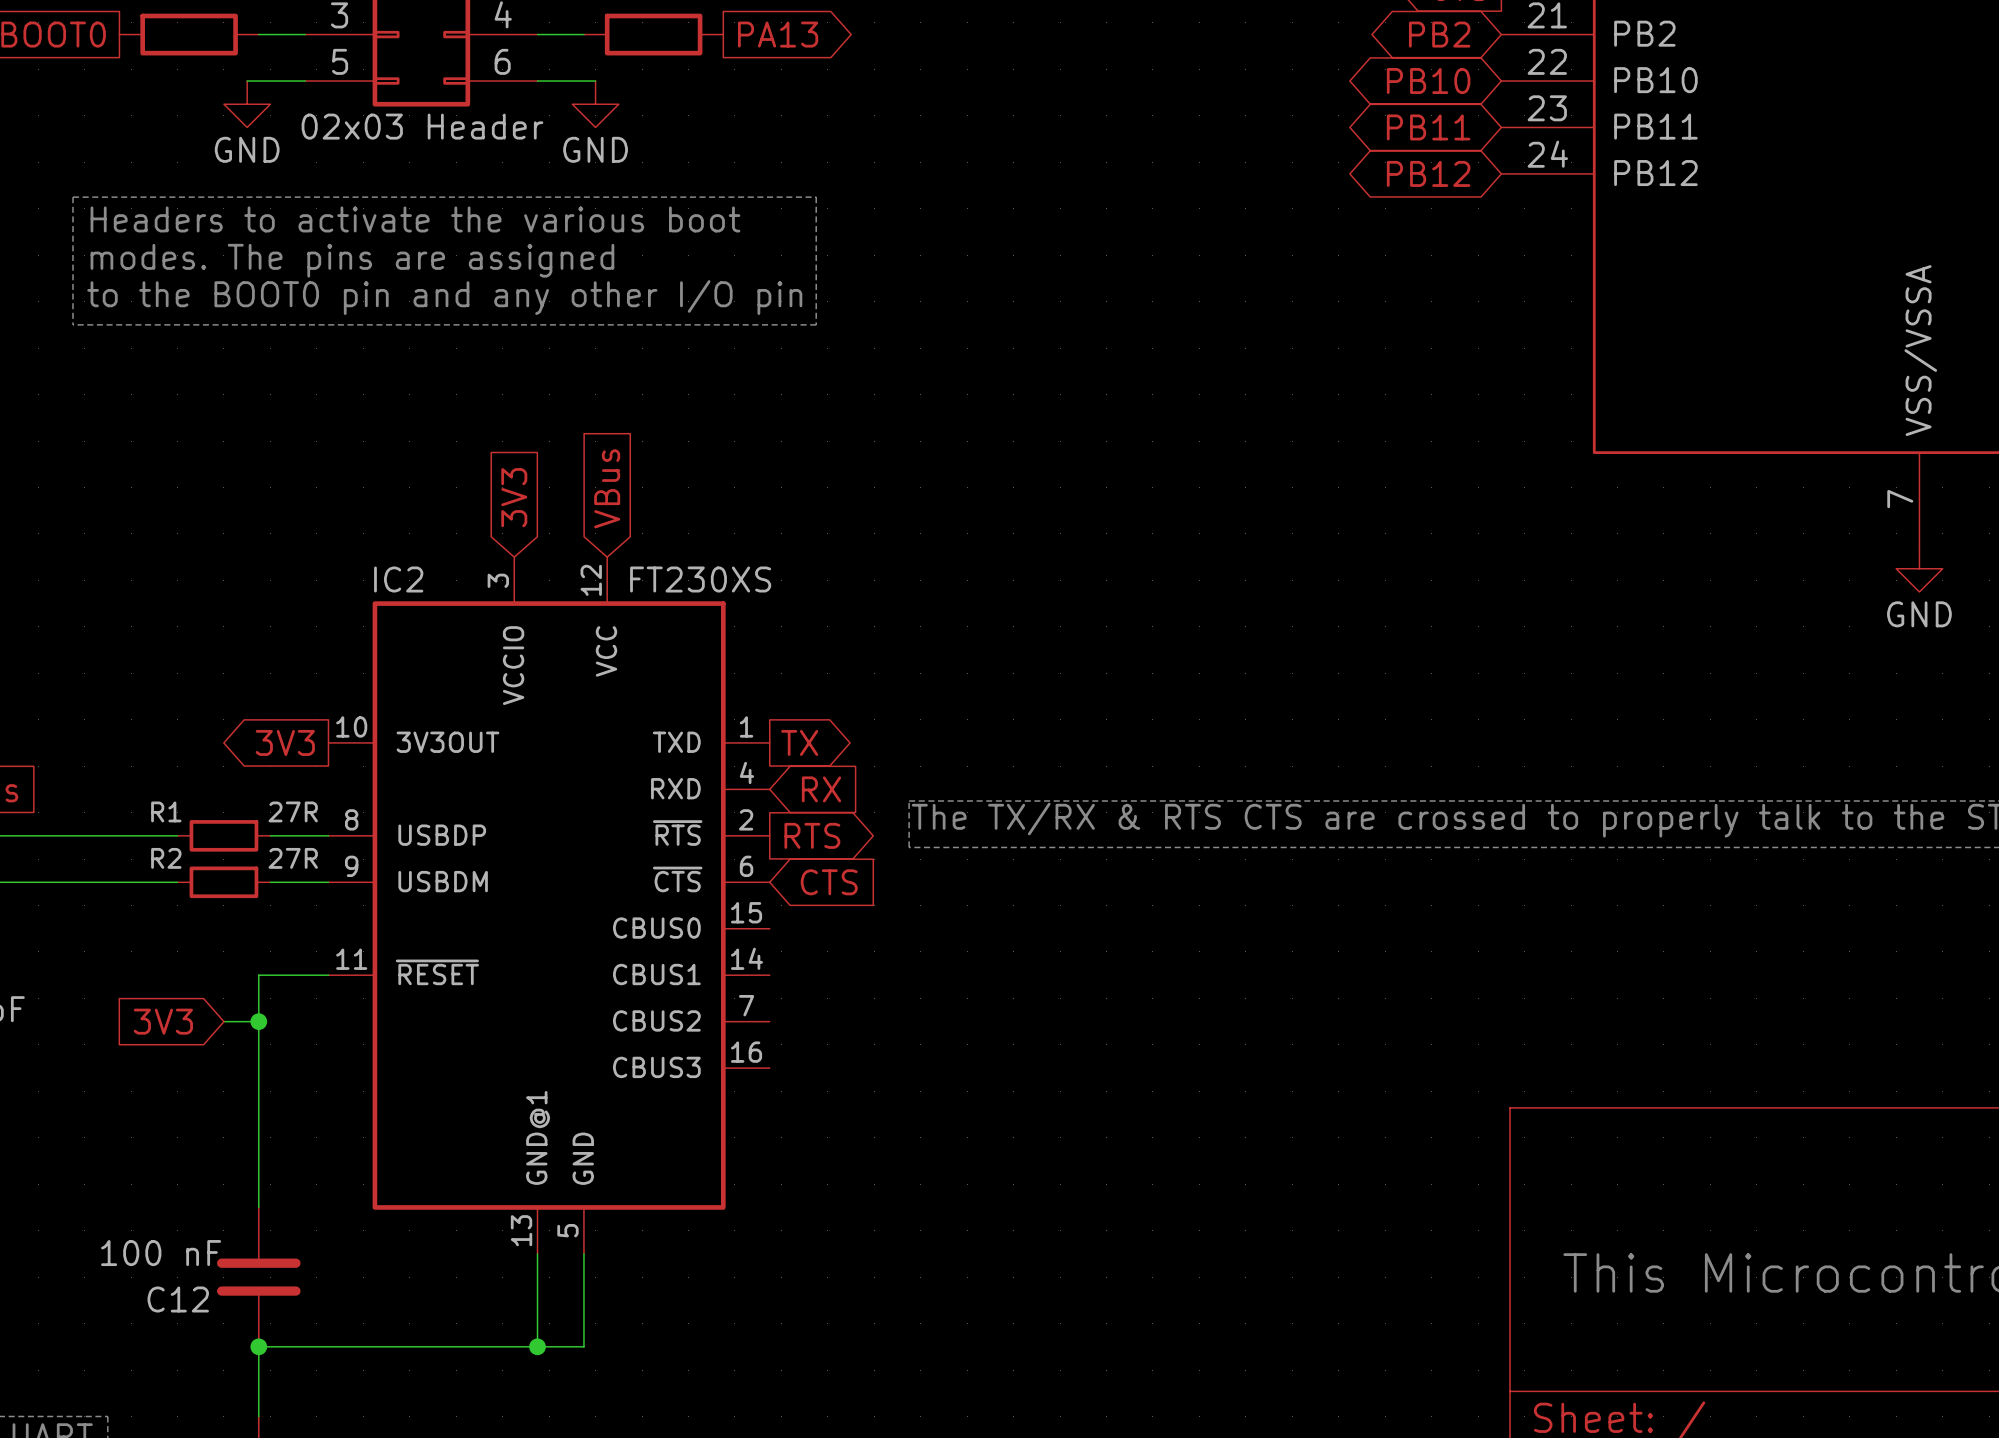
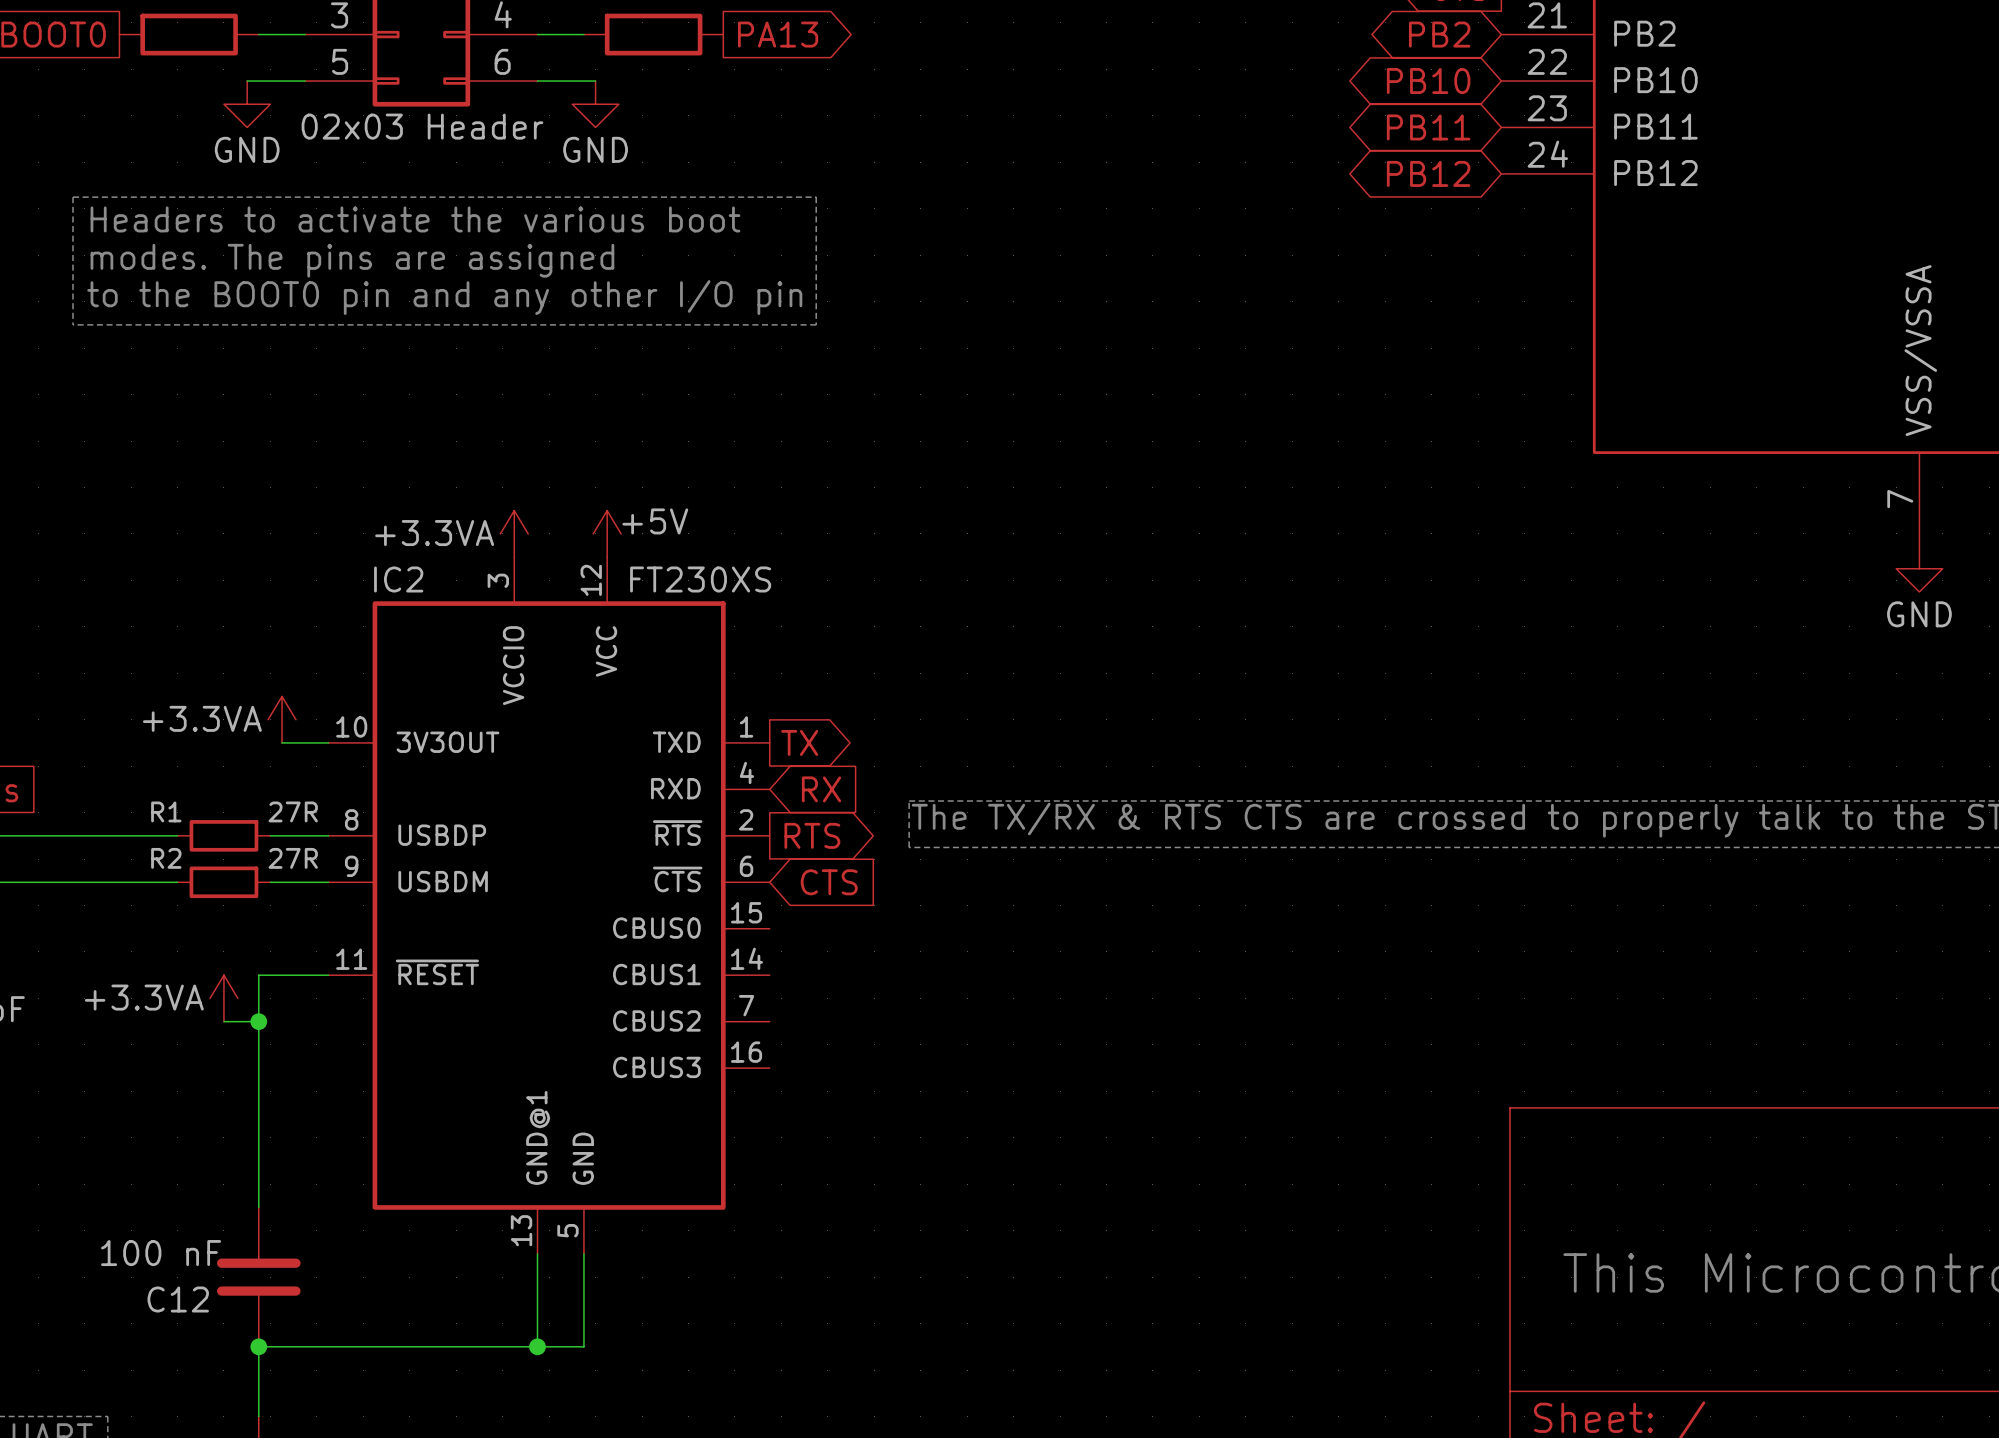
global label: VBus (607, 488) -> none
global label: 3V3 (514, 497) -> none
power symbol: none -> +3.3VA (514, 533)
power symbol: none -> +5V (607, 533)
power symbol: none -> +3.3VA (282, 719)
wire: none -> (282, 742) (328, 742)
global label: 3V3 (285, 742) -> none
power symbol: none -> +3.3VA (223, 998)
global label: 3V3 (163, 1021) -> none

